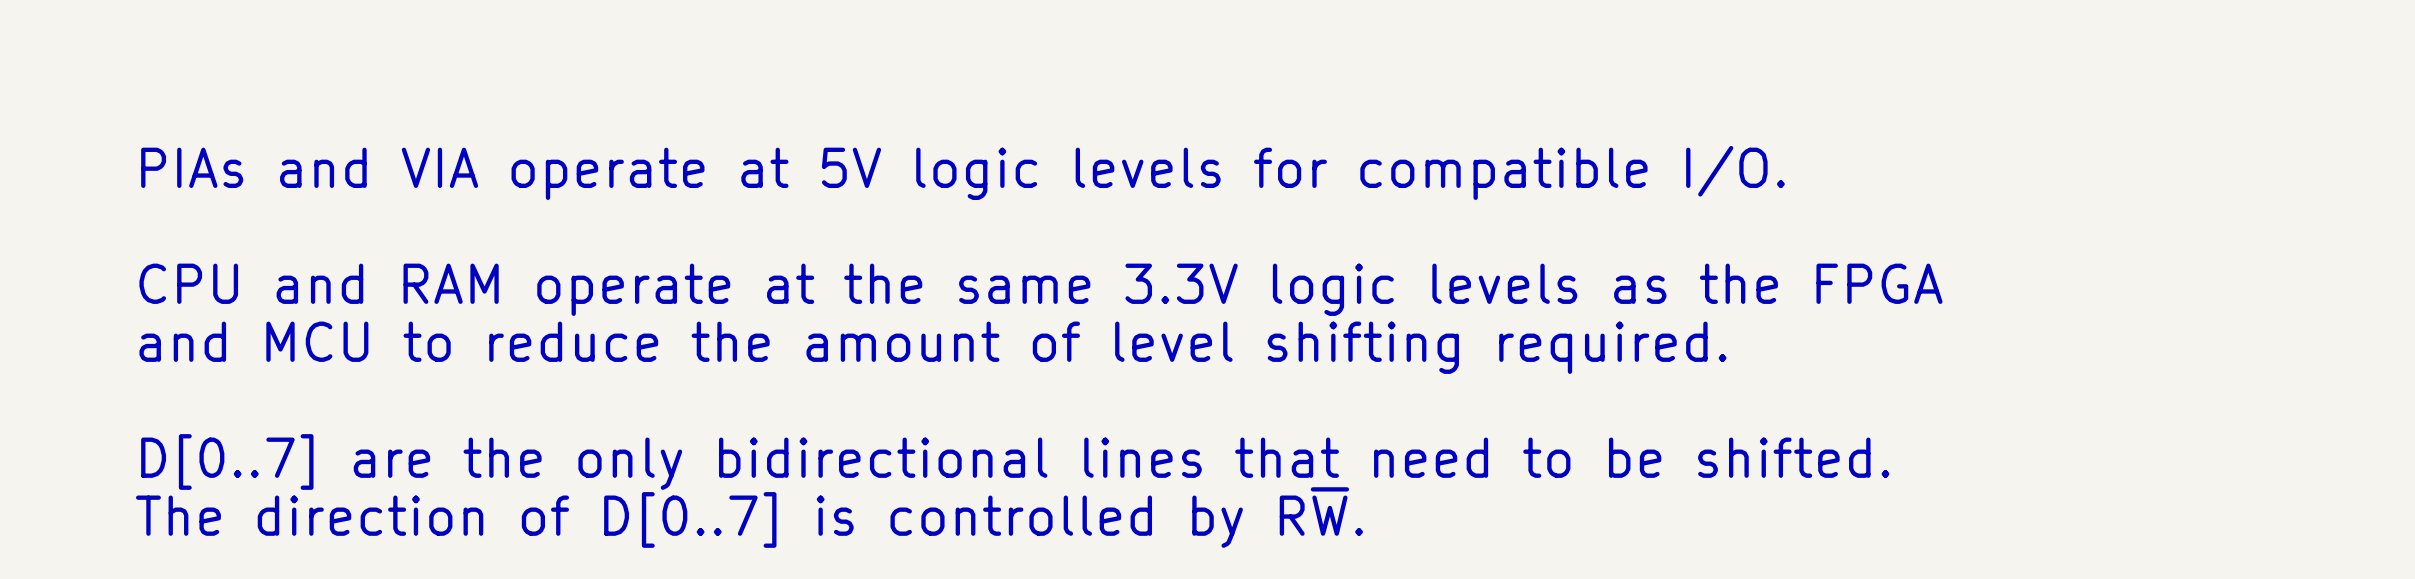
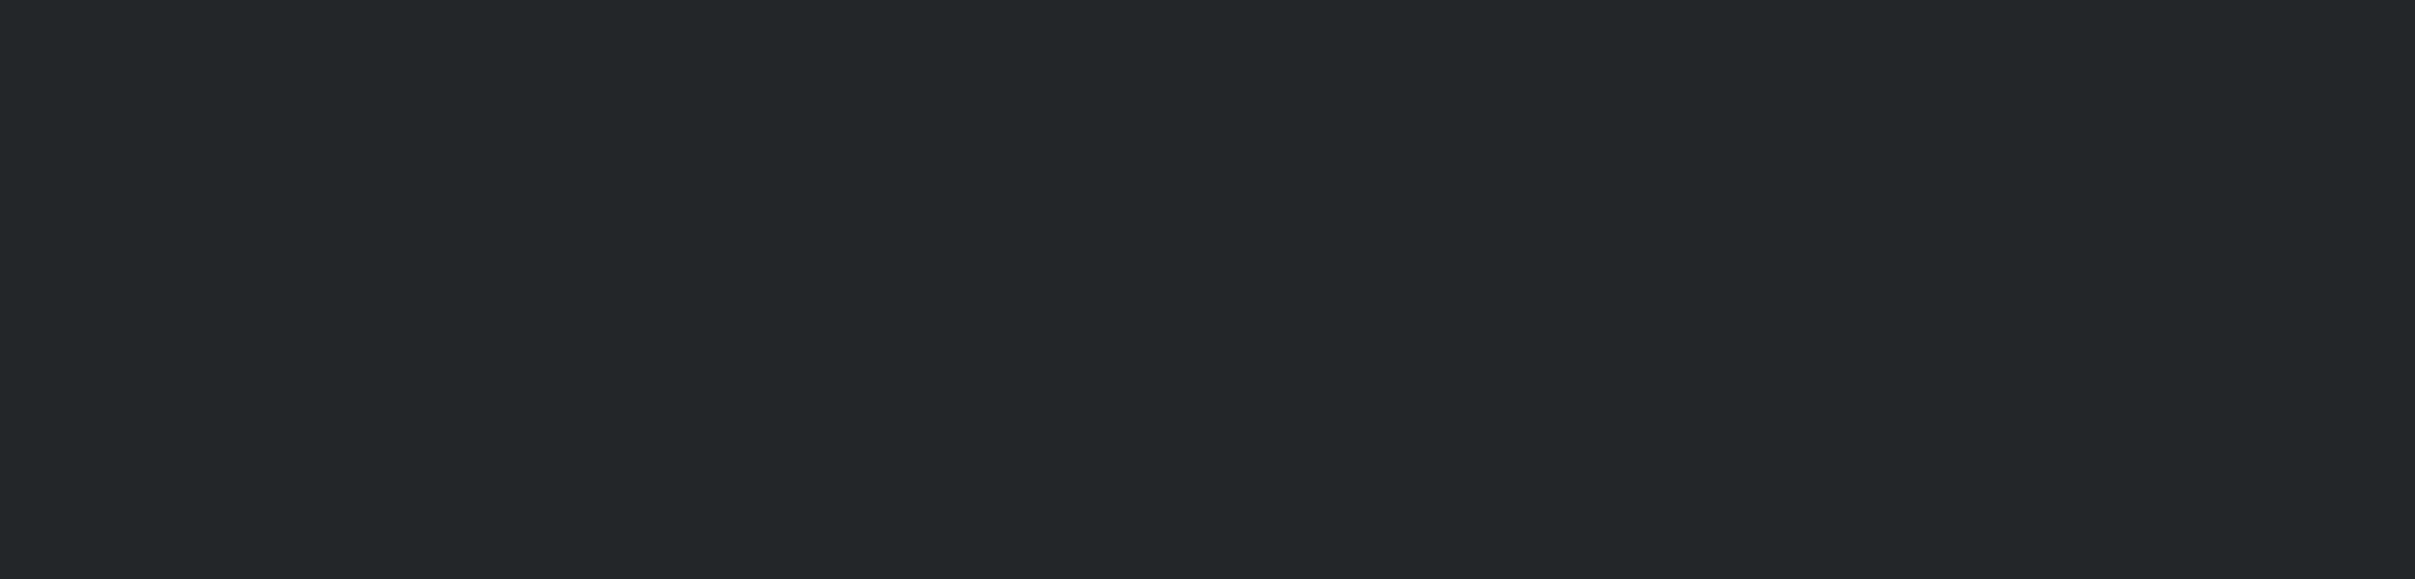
text: PIAs and VIA operate at 5V logic levels for compatible I/O. (962, 172) -> none
text: CPU and RAM operate at the same 3.3V logic levels as the FPGA (1040, 289) -> none
text: and MCU to reduce the amount of level shifting required. (932, 347) -> none
text: D[0..7] are the only bidirectional lines that need to be shifted. (1015, 461) -> none
text: The direction of D[0..7] is controlled by R~{W}. (749, 517) -> none

